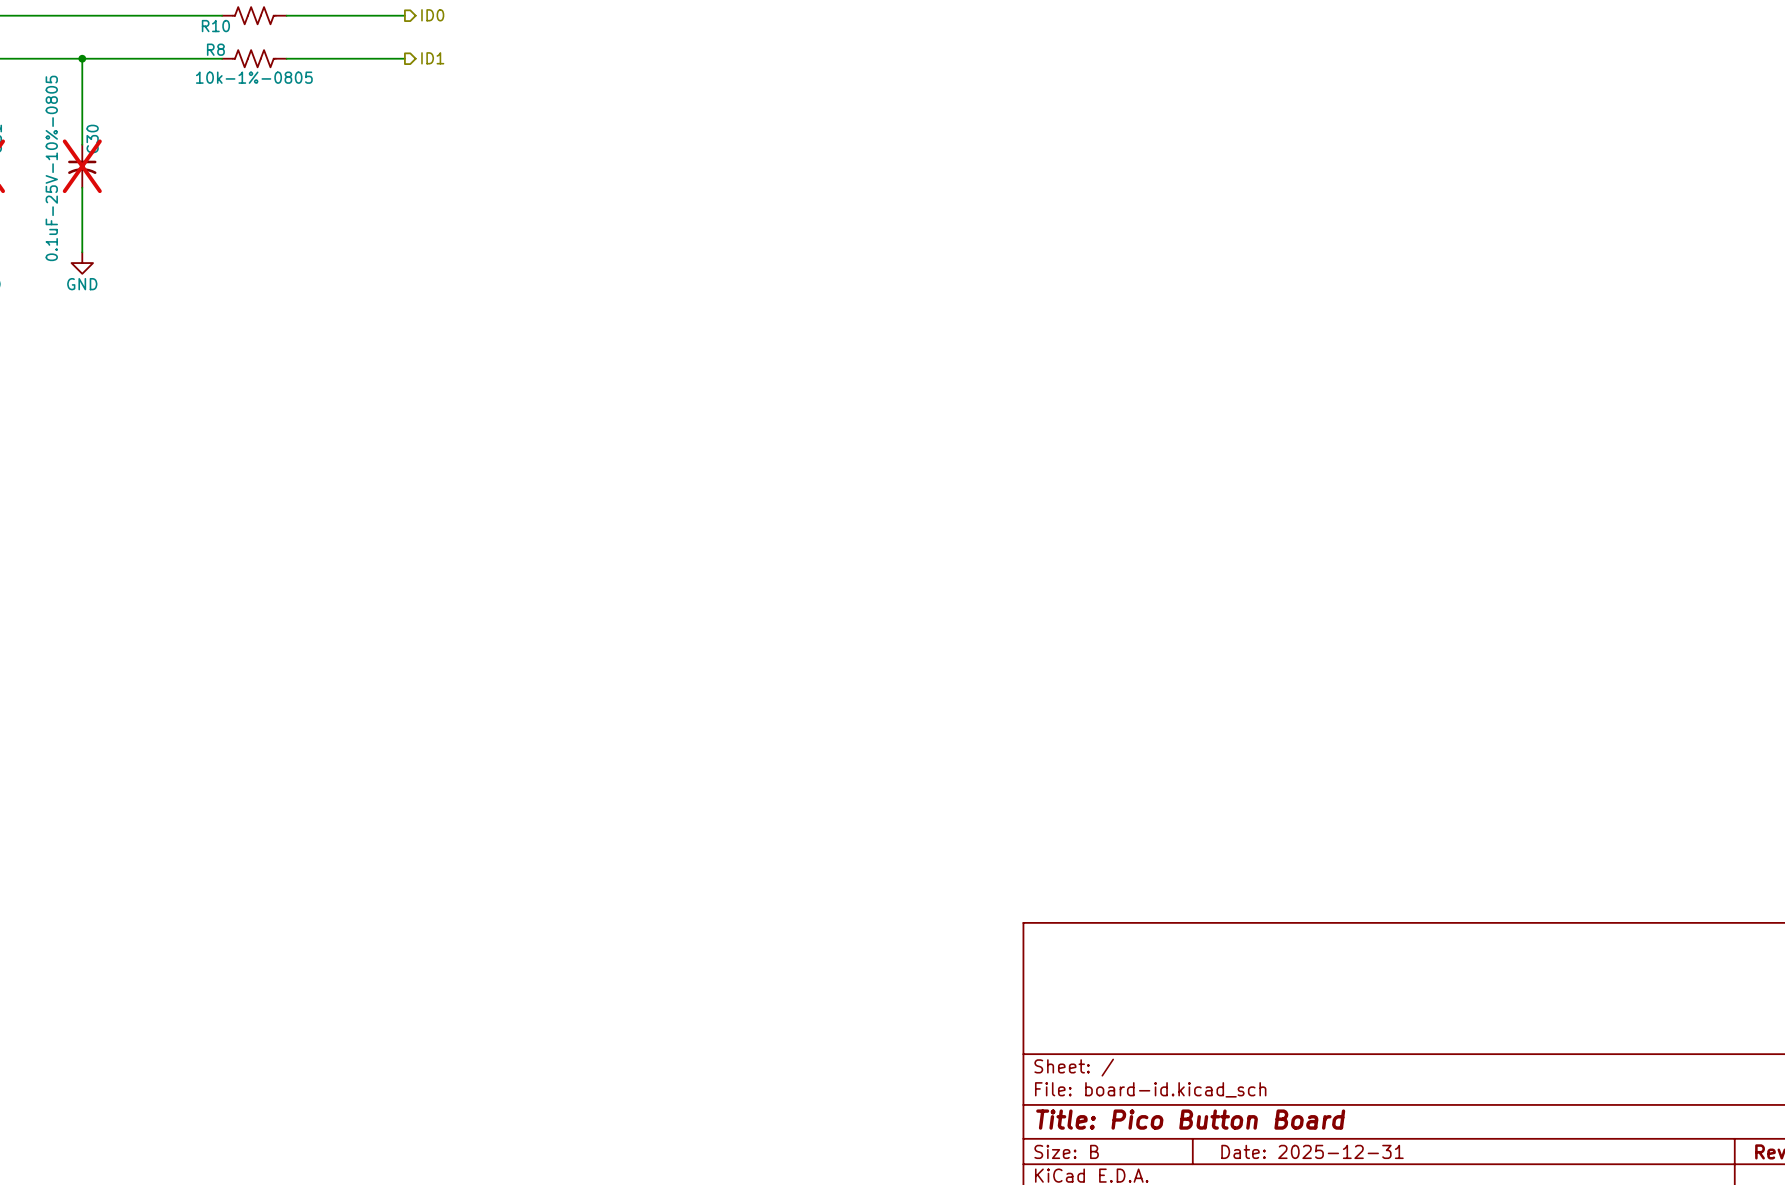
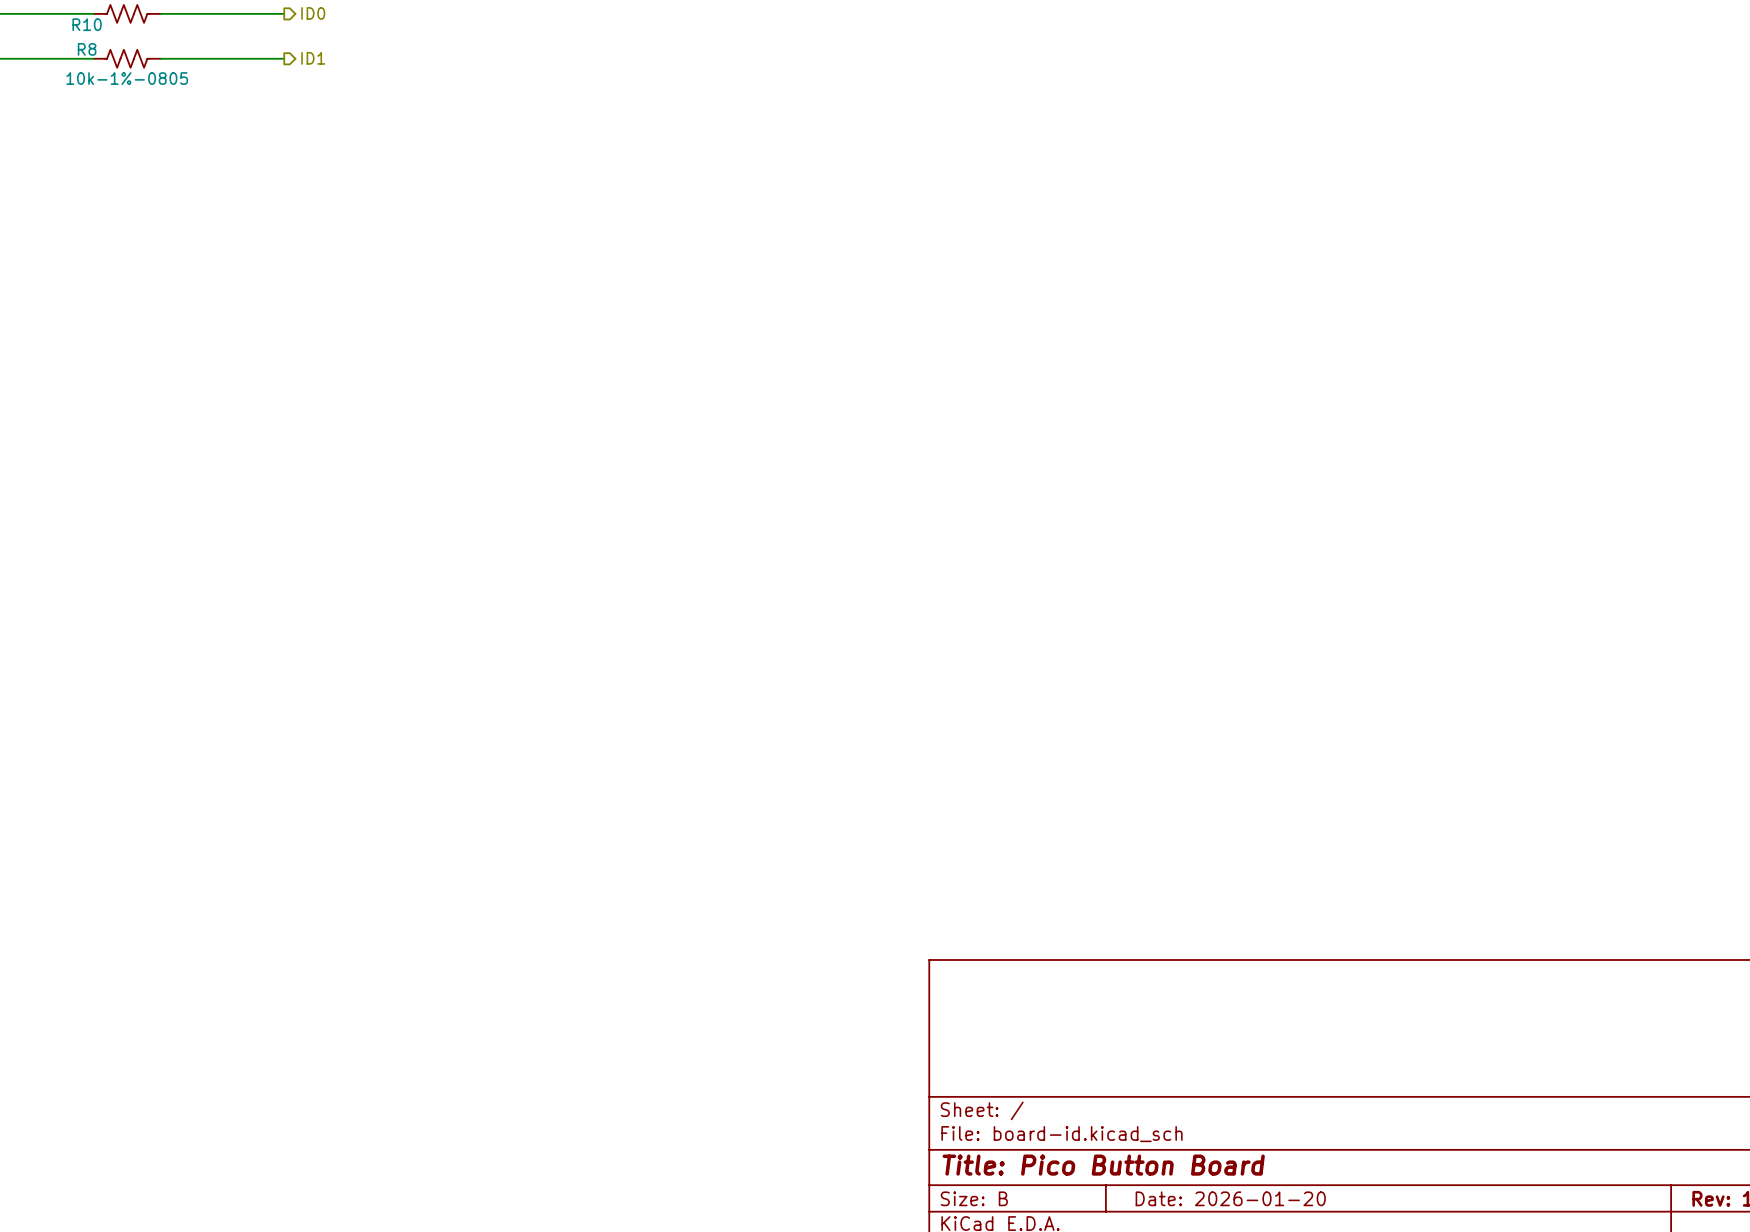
title block: Date: 2025-12-31 (1312, 1151) -> Date: 2026-01-20 (1230, 1198)

